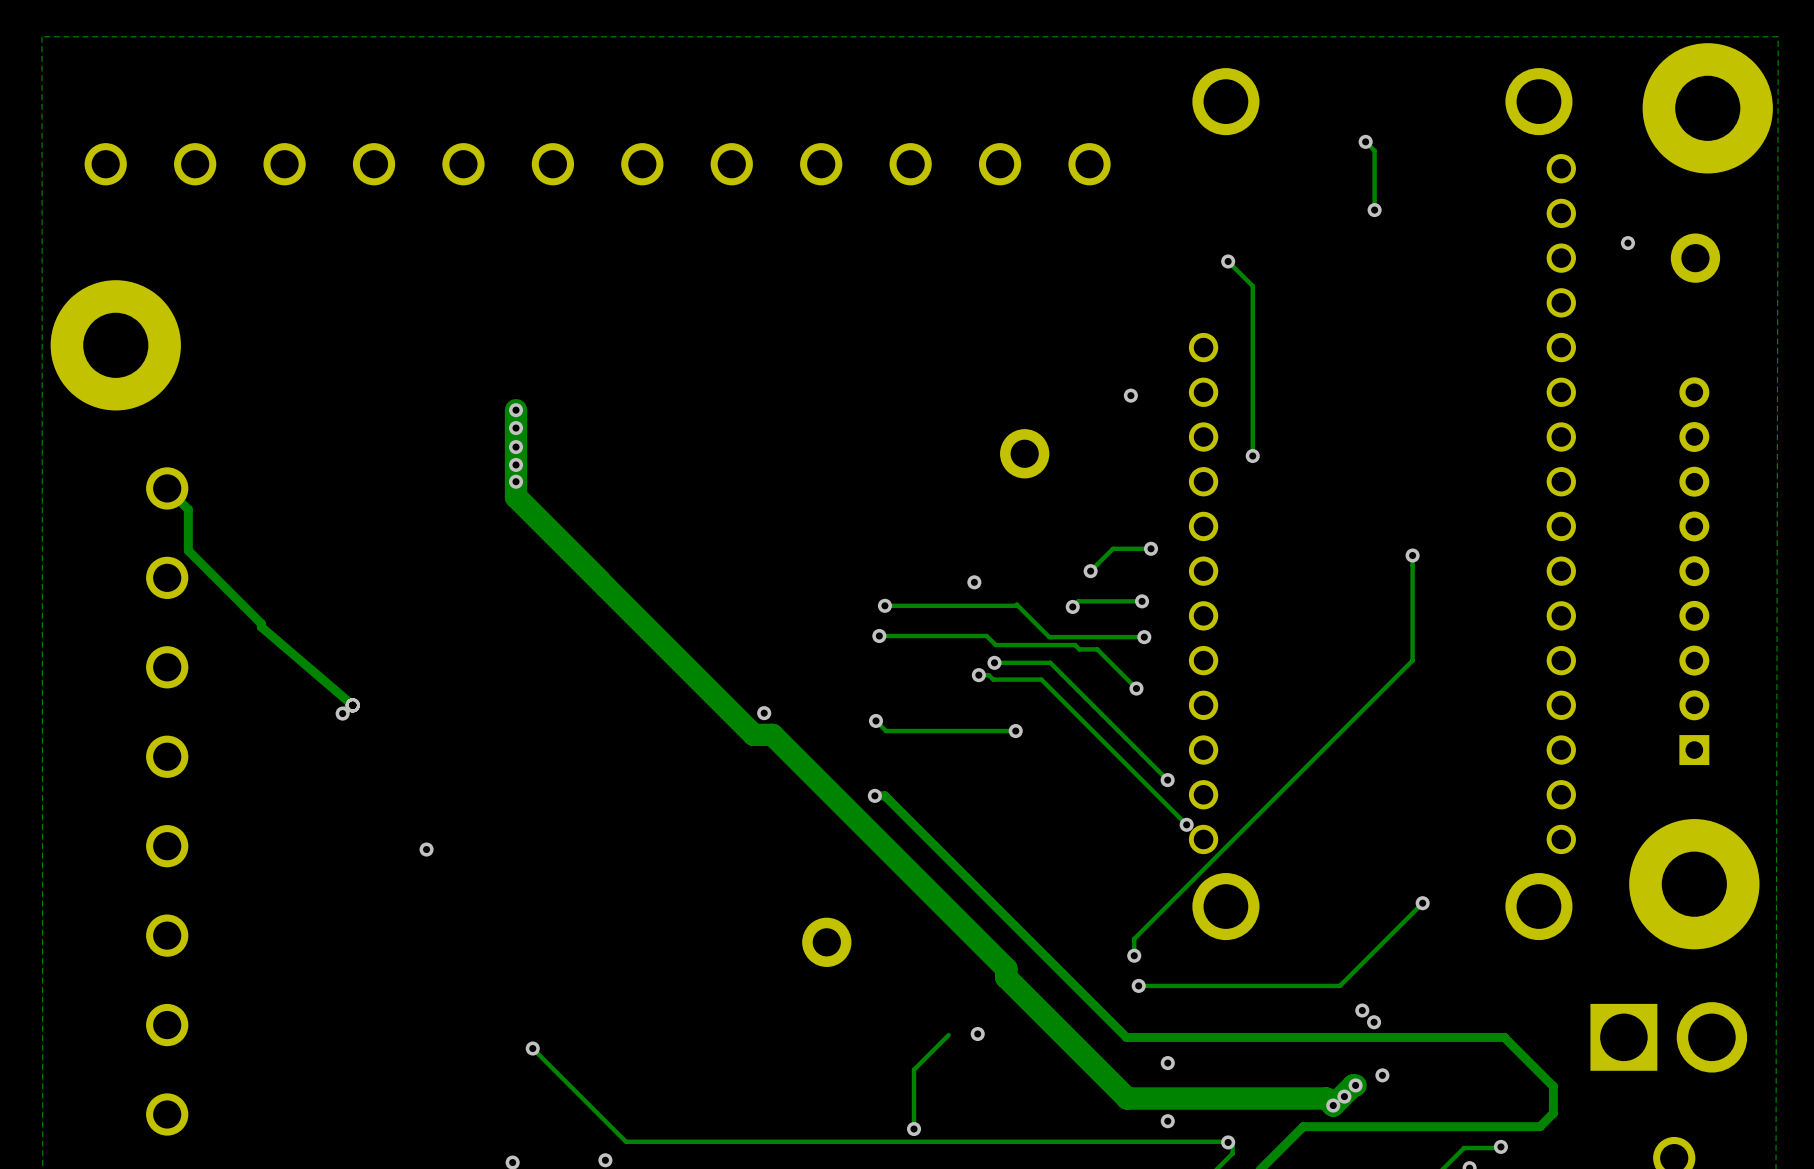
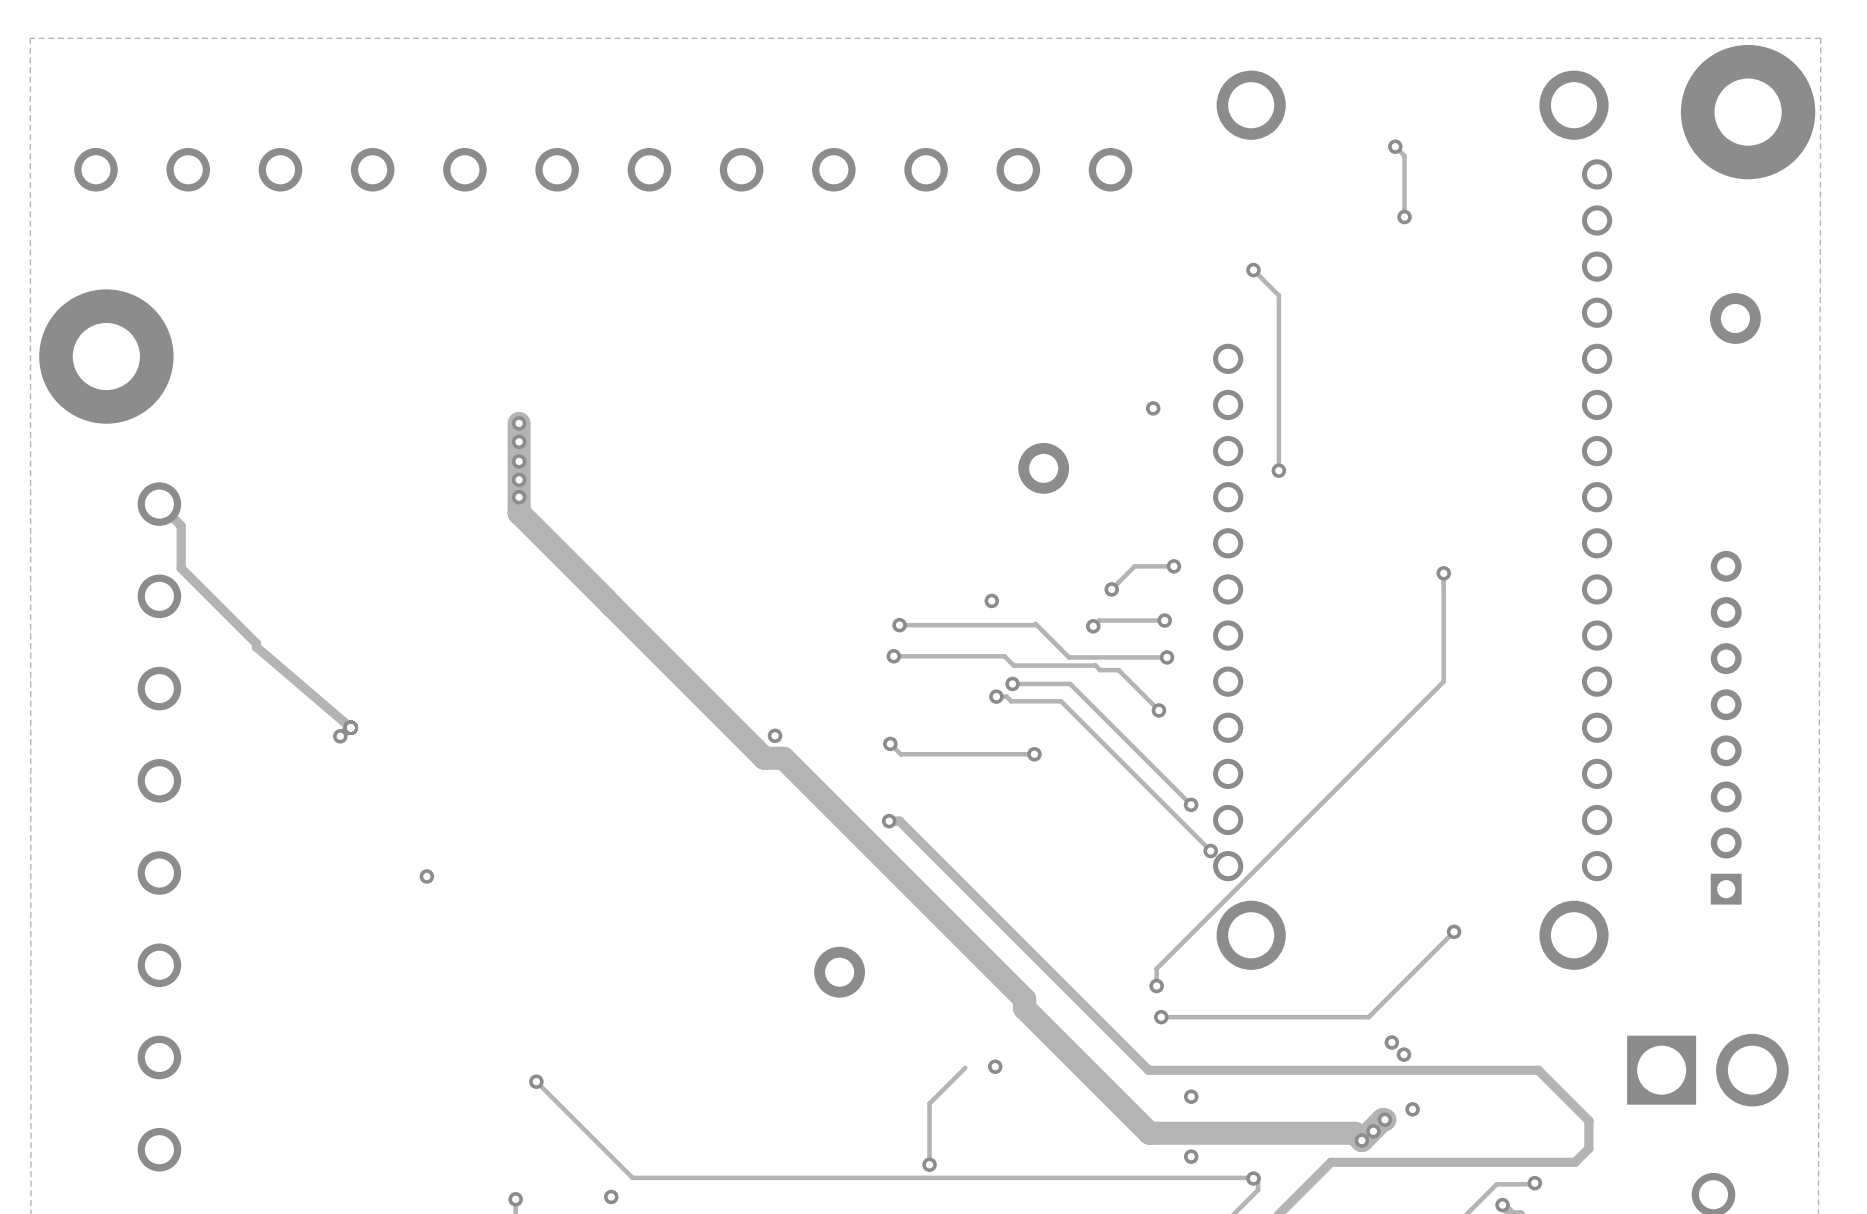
via: (1627, 243) -> none
part position: (1695, 258) -> (1735, 318)
part: (1694, 571) -> none
part: none -> (1726, 727)
part: (1694, 884) -> none

